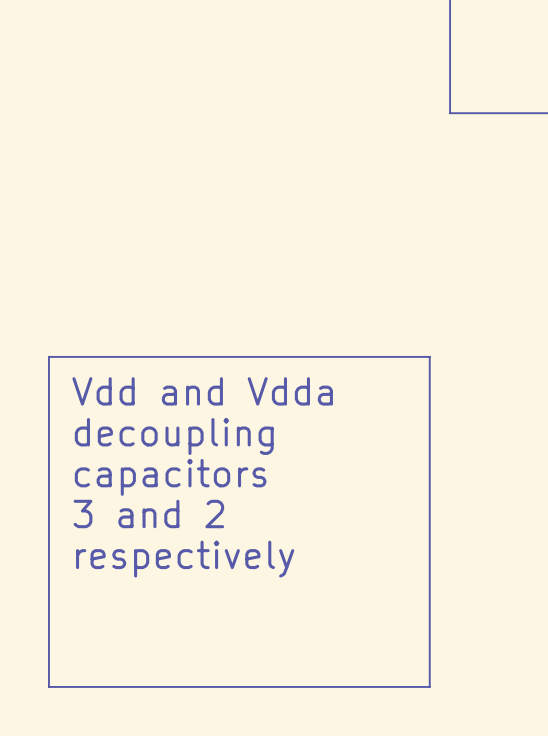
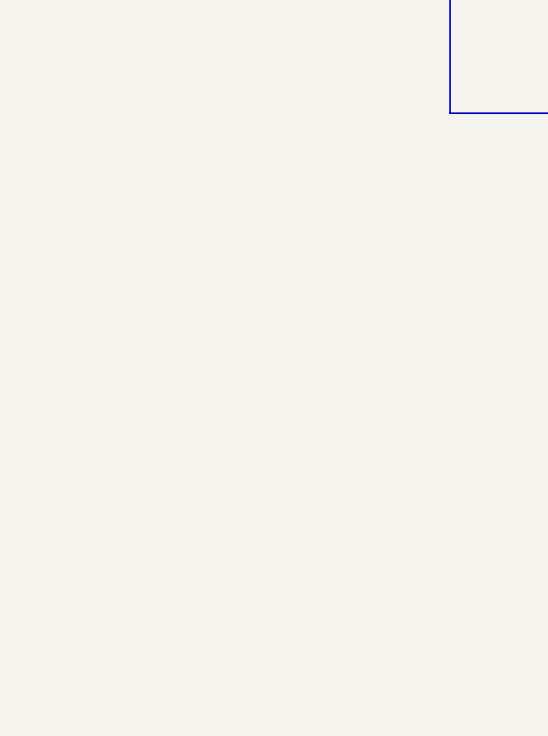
line: (48, 356) (429, 356) (429, 686) (48, 686) (48, 356) -> none
text: Vdd and Vdda (202, 391) -> none
text: decoupling (174, 436) -> none
text: capacitors (170, 477) -> none
text: 3 and 2 (148, 514) -> none
text: respectively (185, 559) -> none

